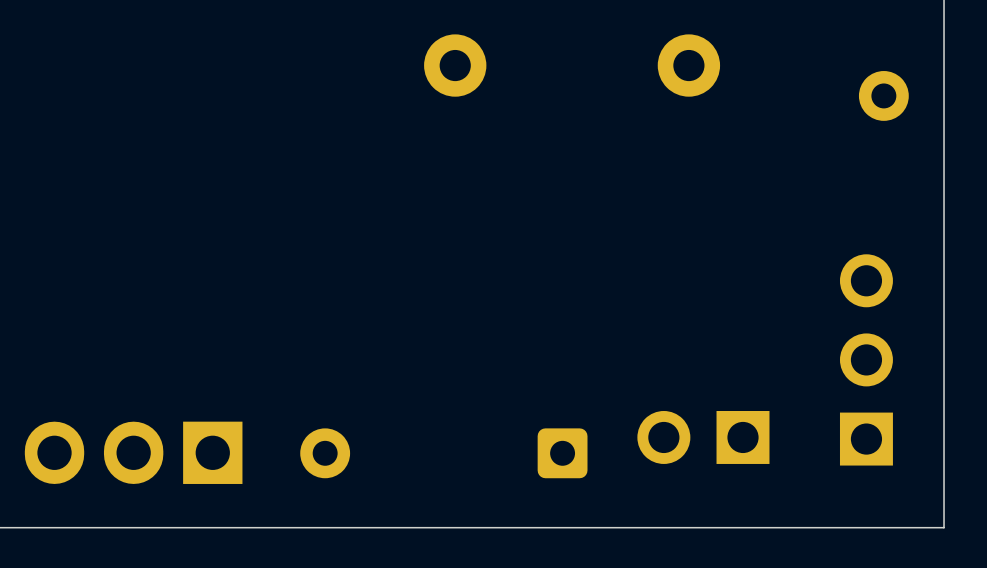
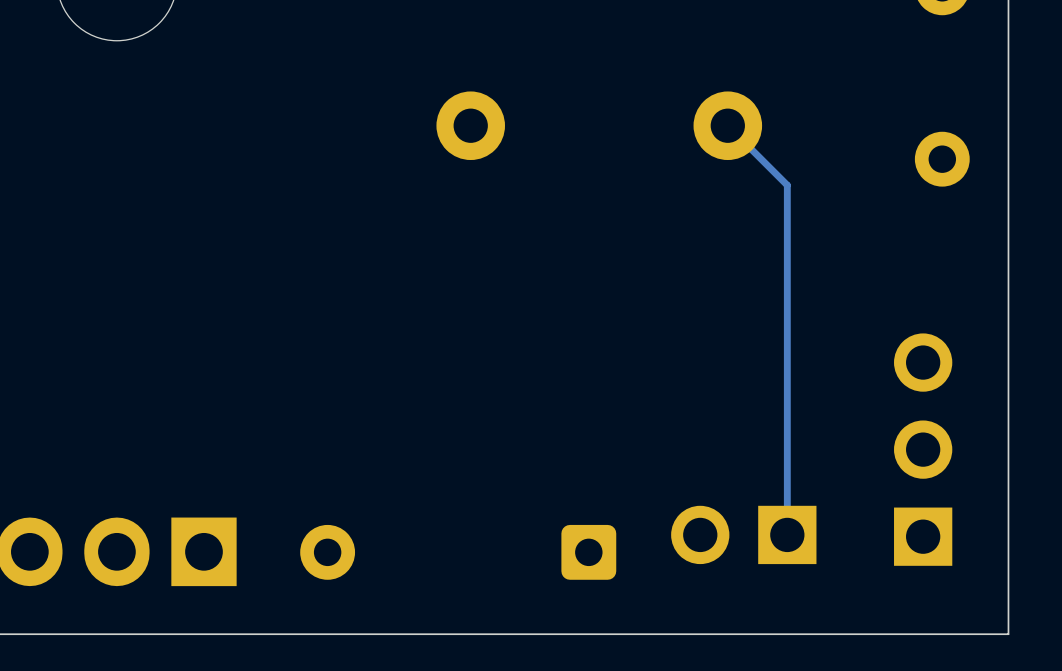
track: none -> (727, 125) (787, 185) (787, 534)

